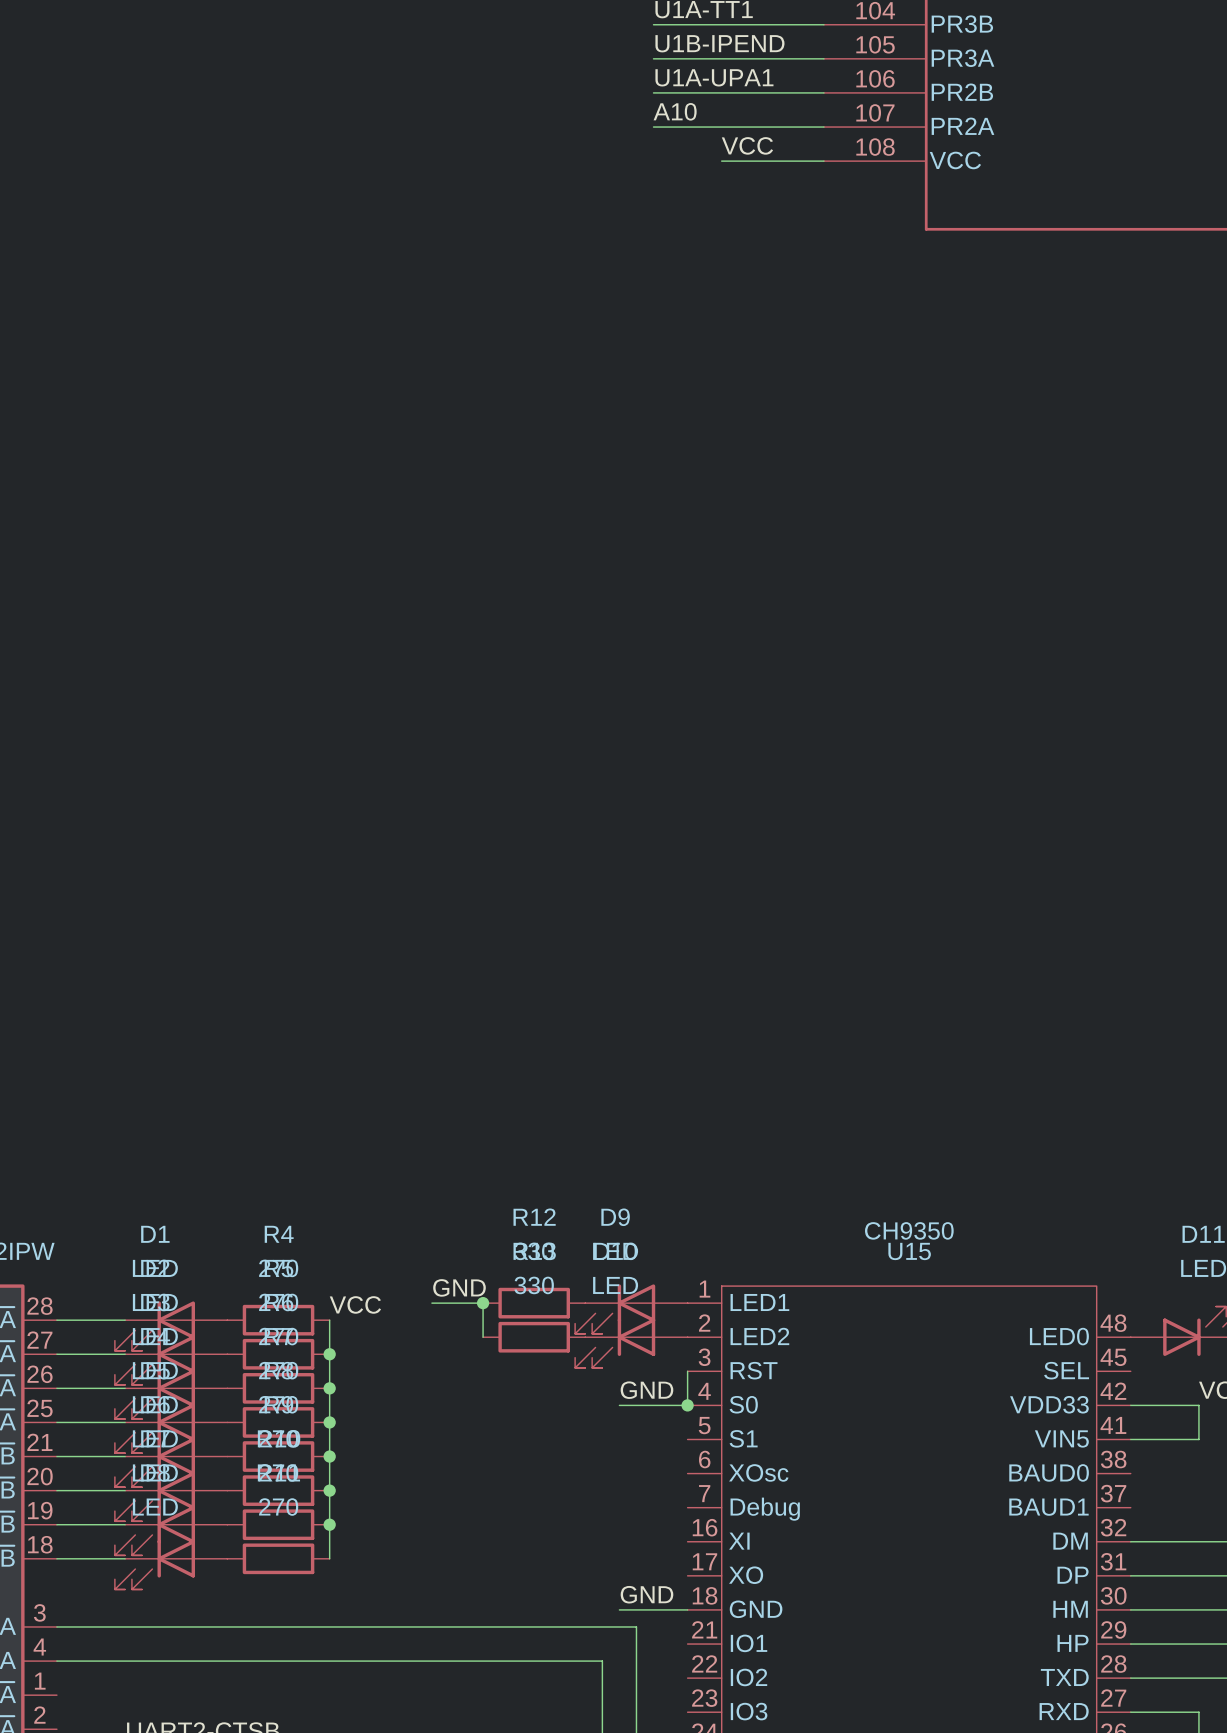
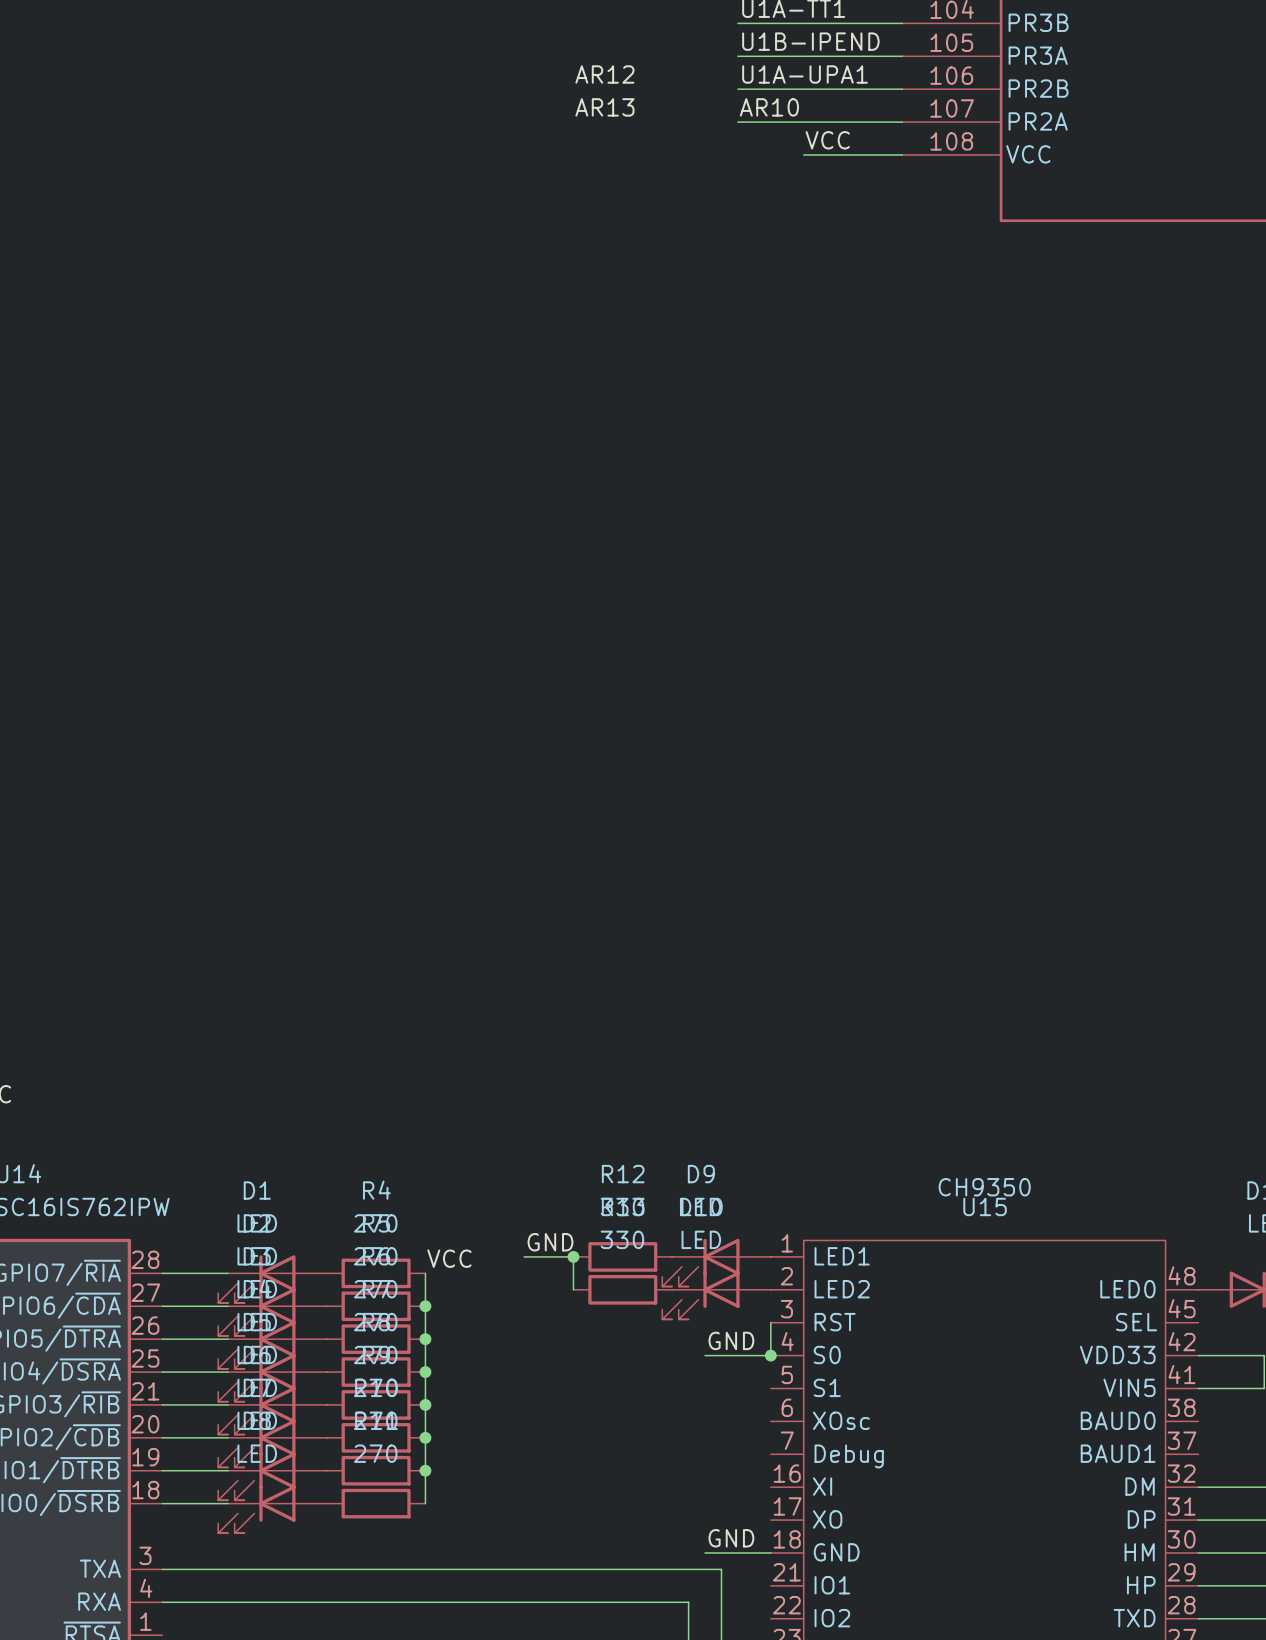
label: none -> AR12 (604, 74)
label: none -> AR13 (604, 107)
label: A10 (675, 111) -> AR10 (769, 107)

